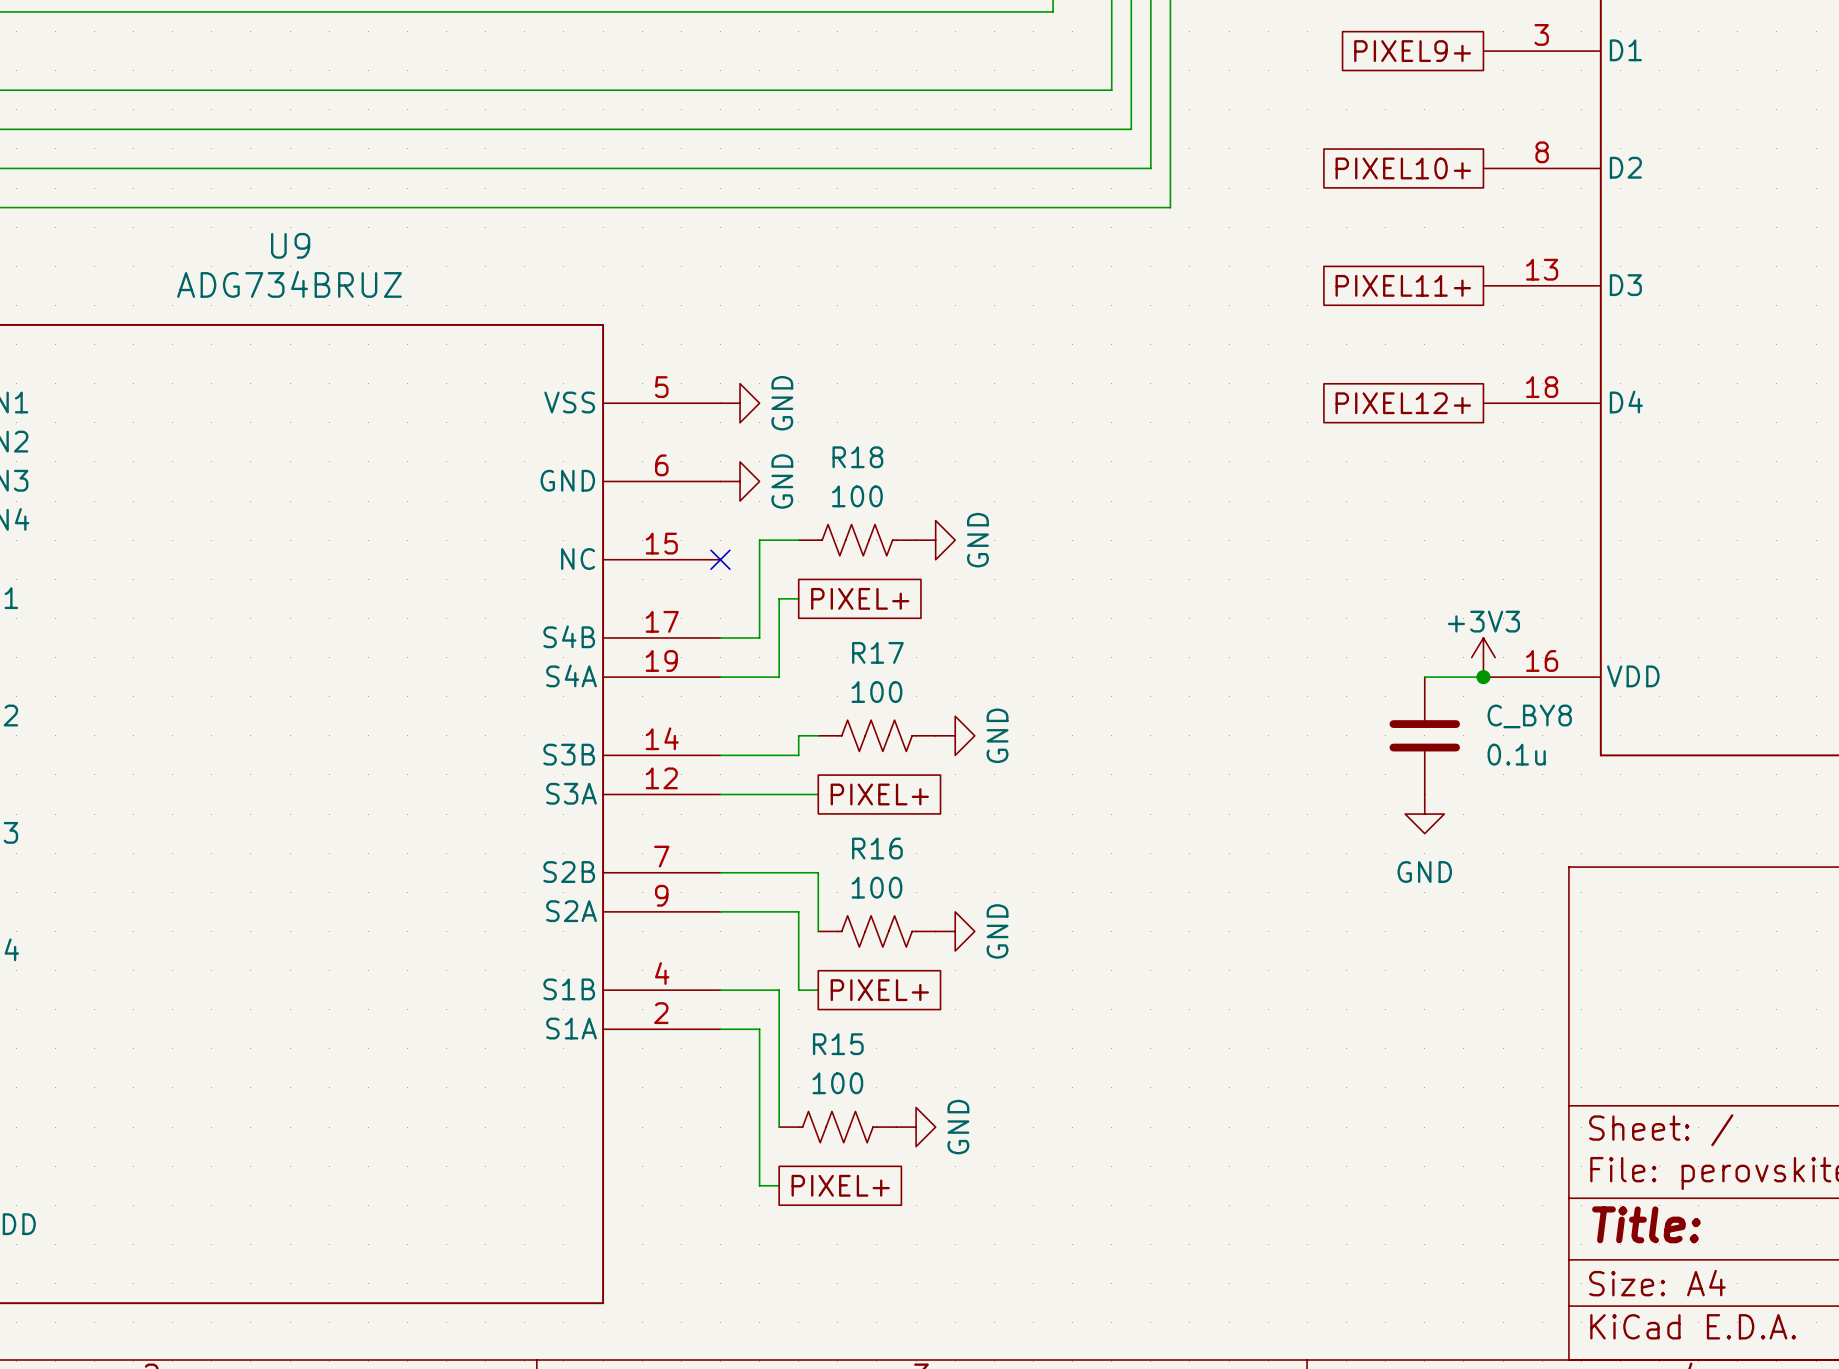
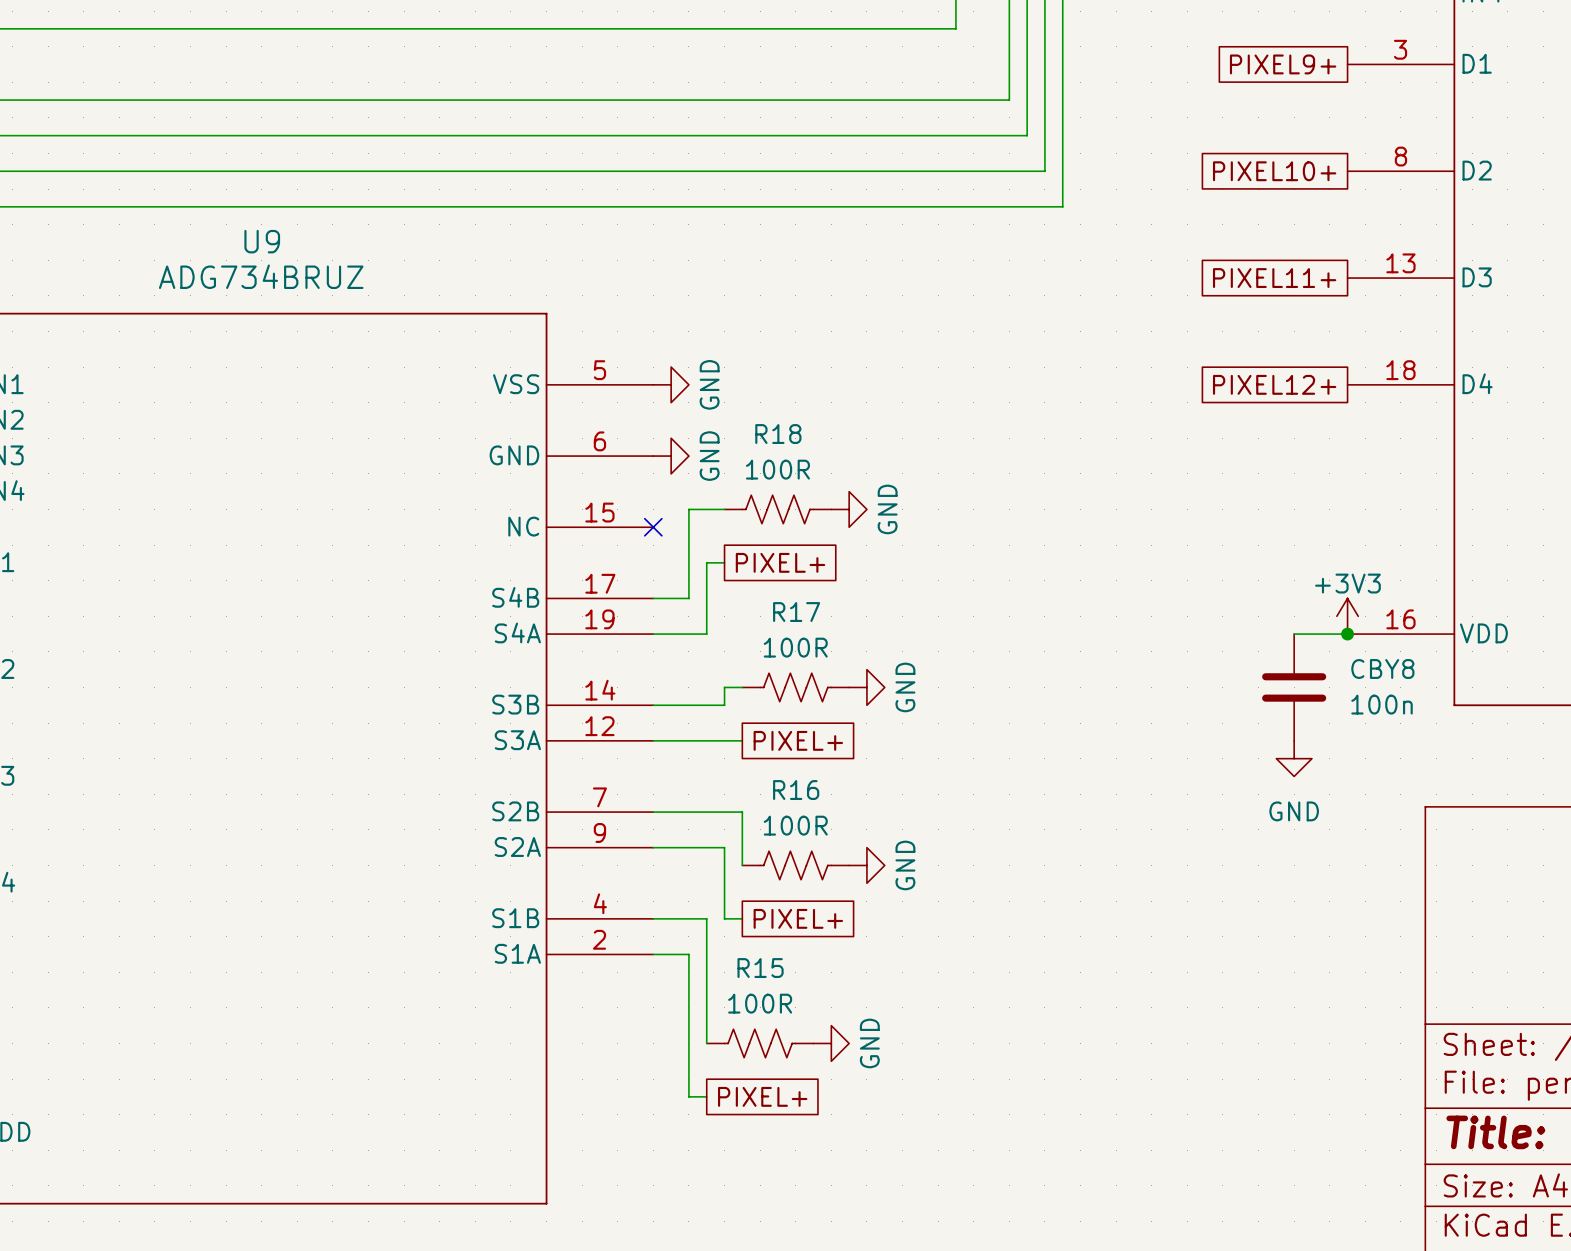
R18 value: 100 (857, 496) -> 100R (777, 469)
R17 value: 100 (876, 692) -> 100R (795, 647)
C_BY8 name: C_BY8 (1529, 716) -> CBY8 (1382, 668)
C_BY8 value: 0.1u (1516, 754) -> 100n (1382, 704)
R16 value: 100 (876, 887) -> 100R (795, 825)
R15 value: 100 (837, 1083) -> 100R (760, 1003)

